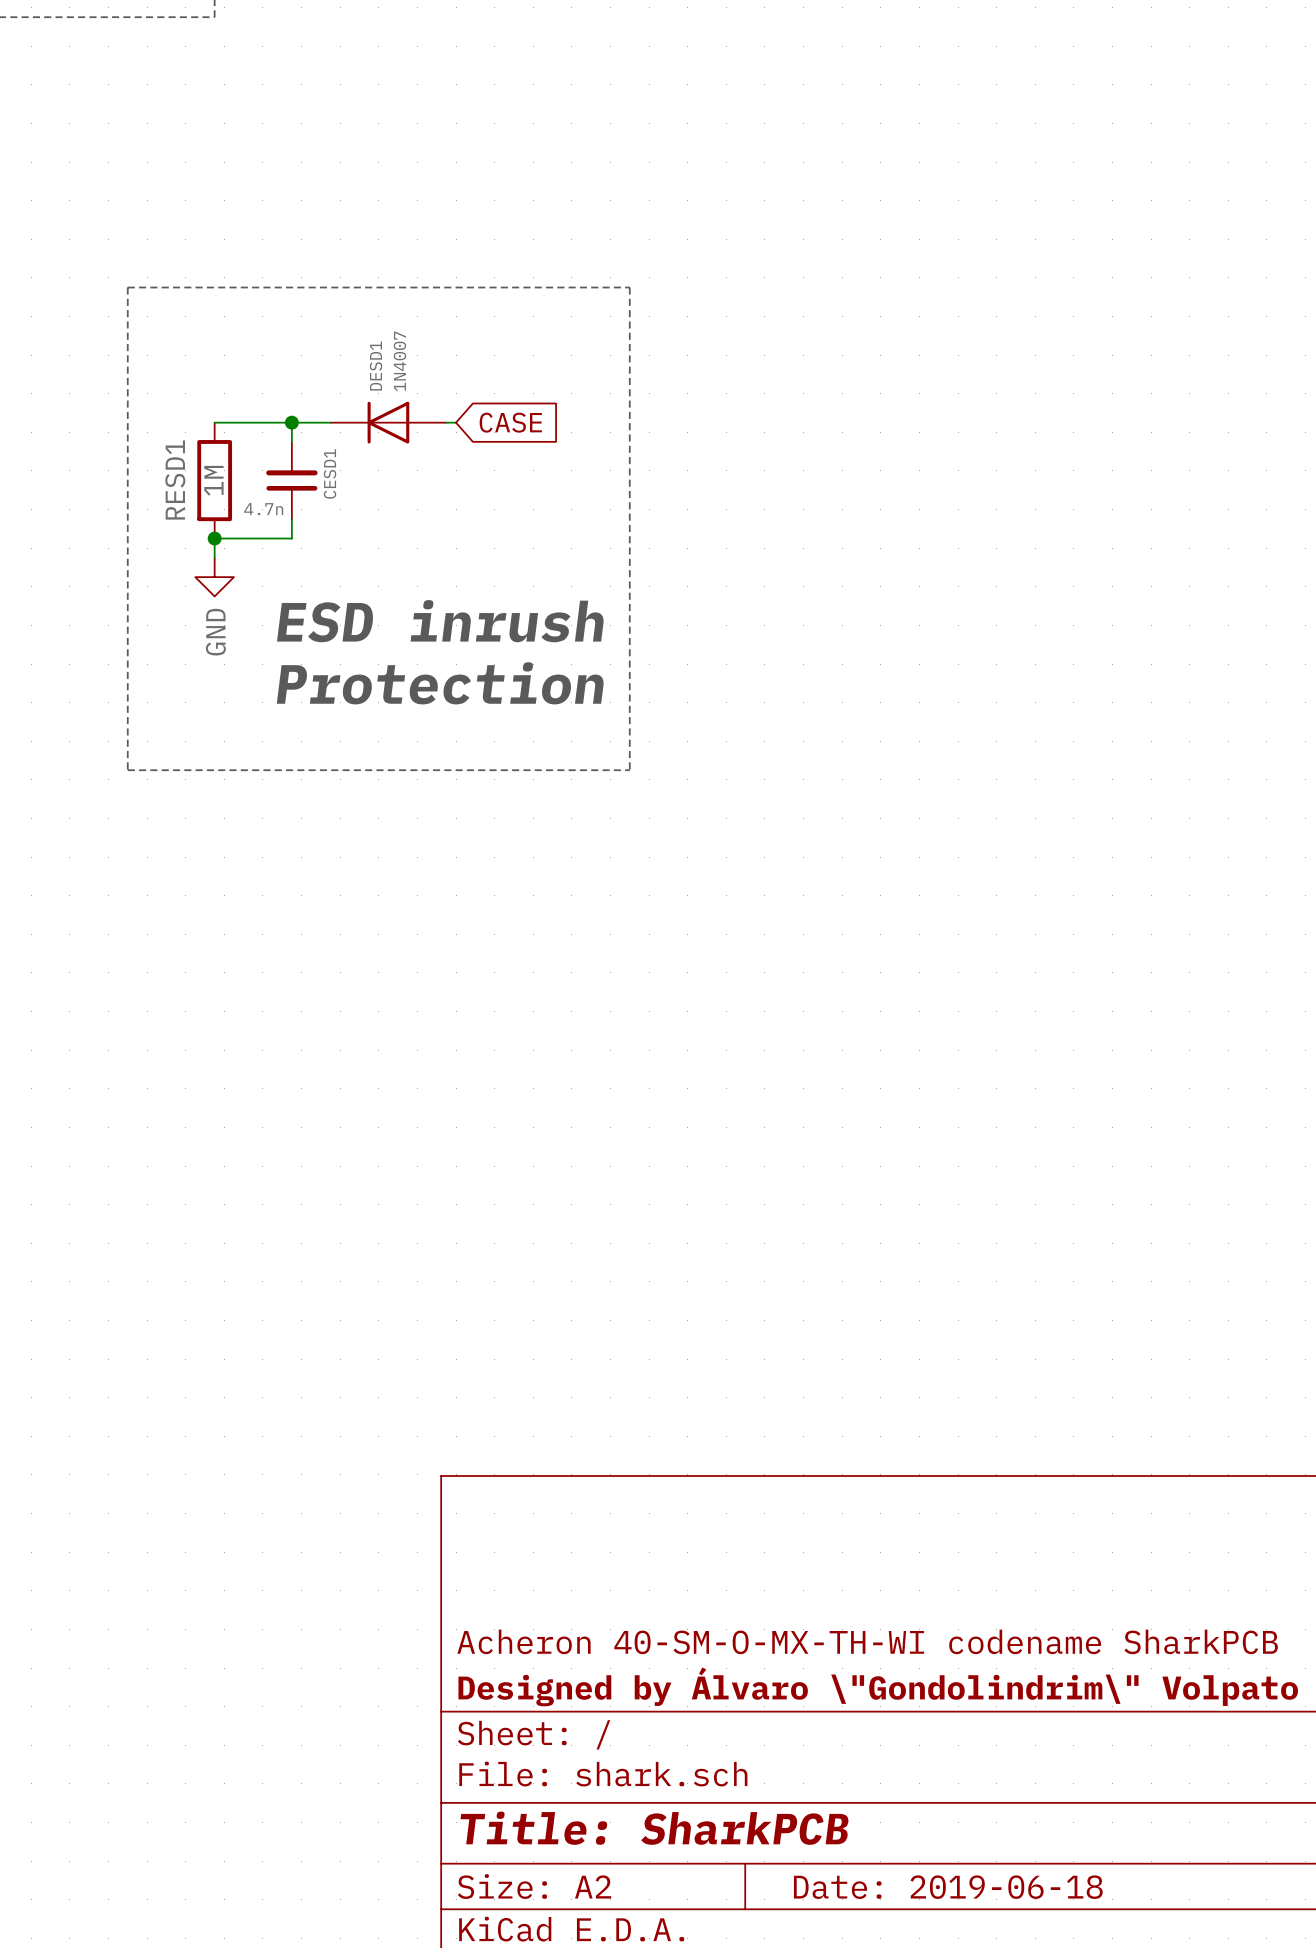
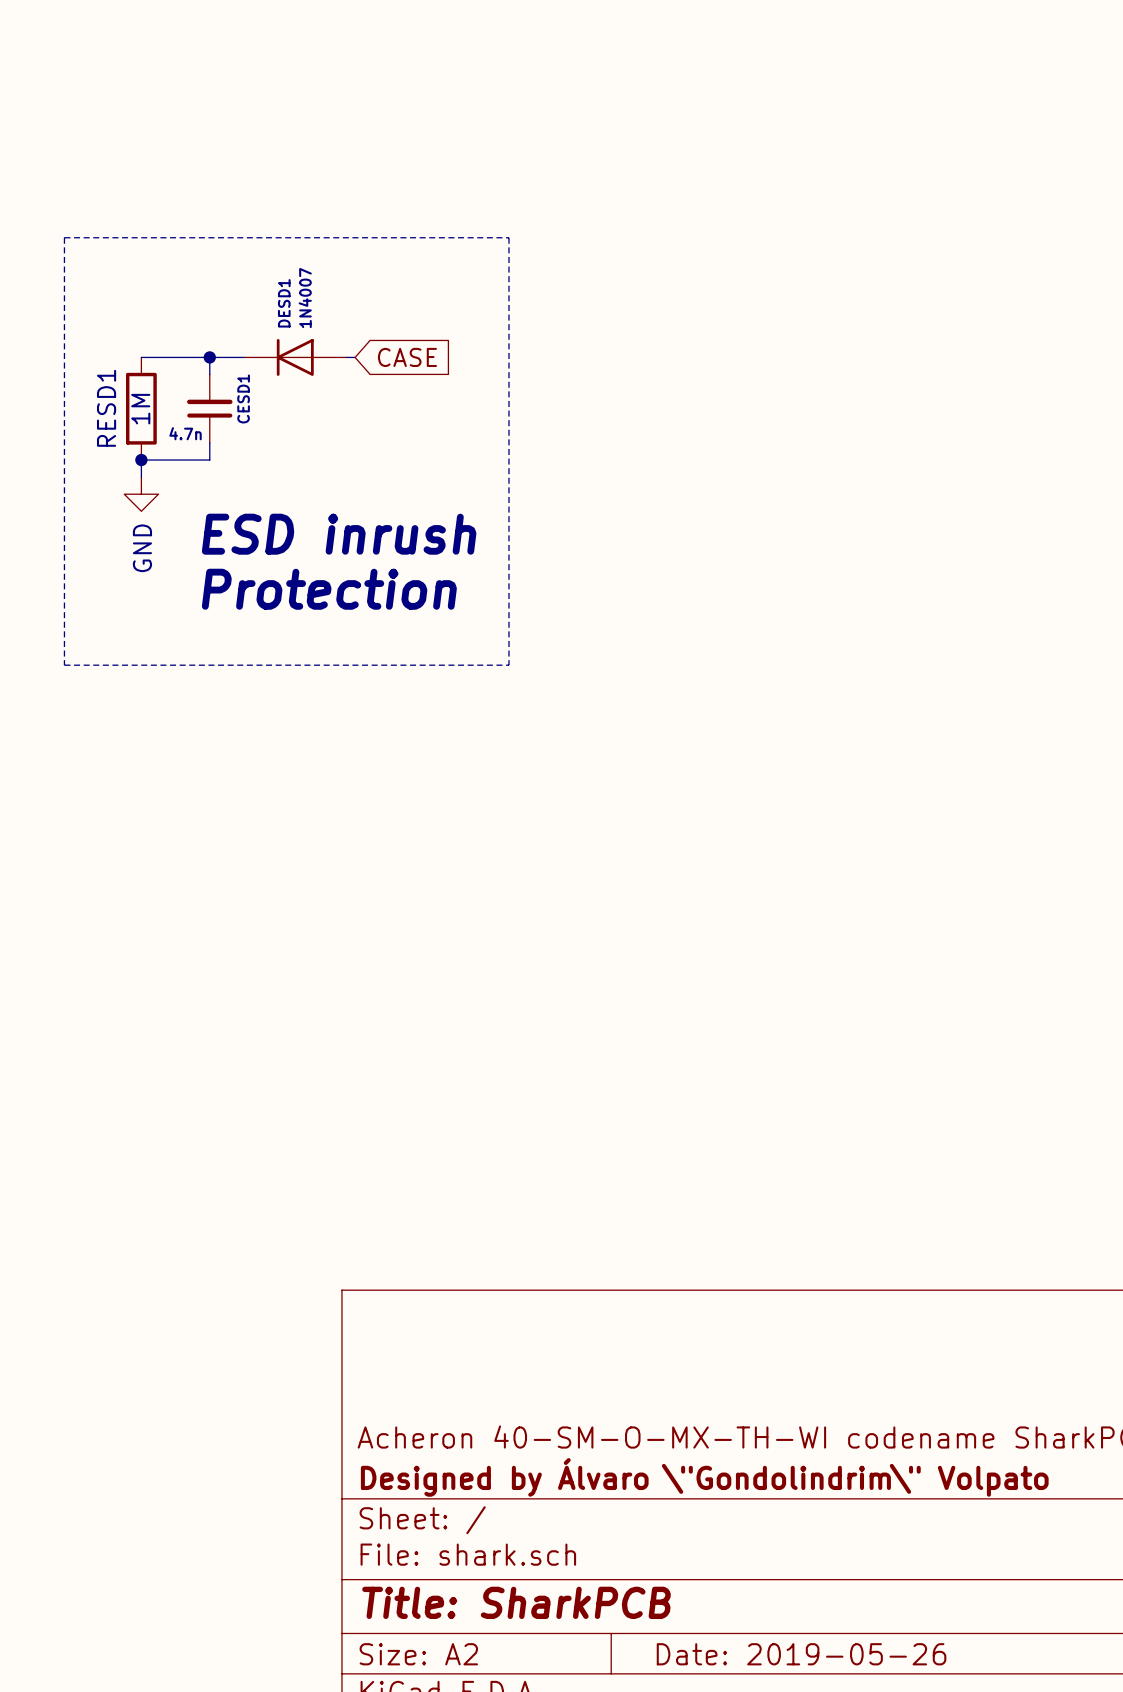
title block: Date: 2019-06-18 (948, 1887) -> Date: 2019-05-26 (801, 1654)

